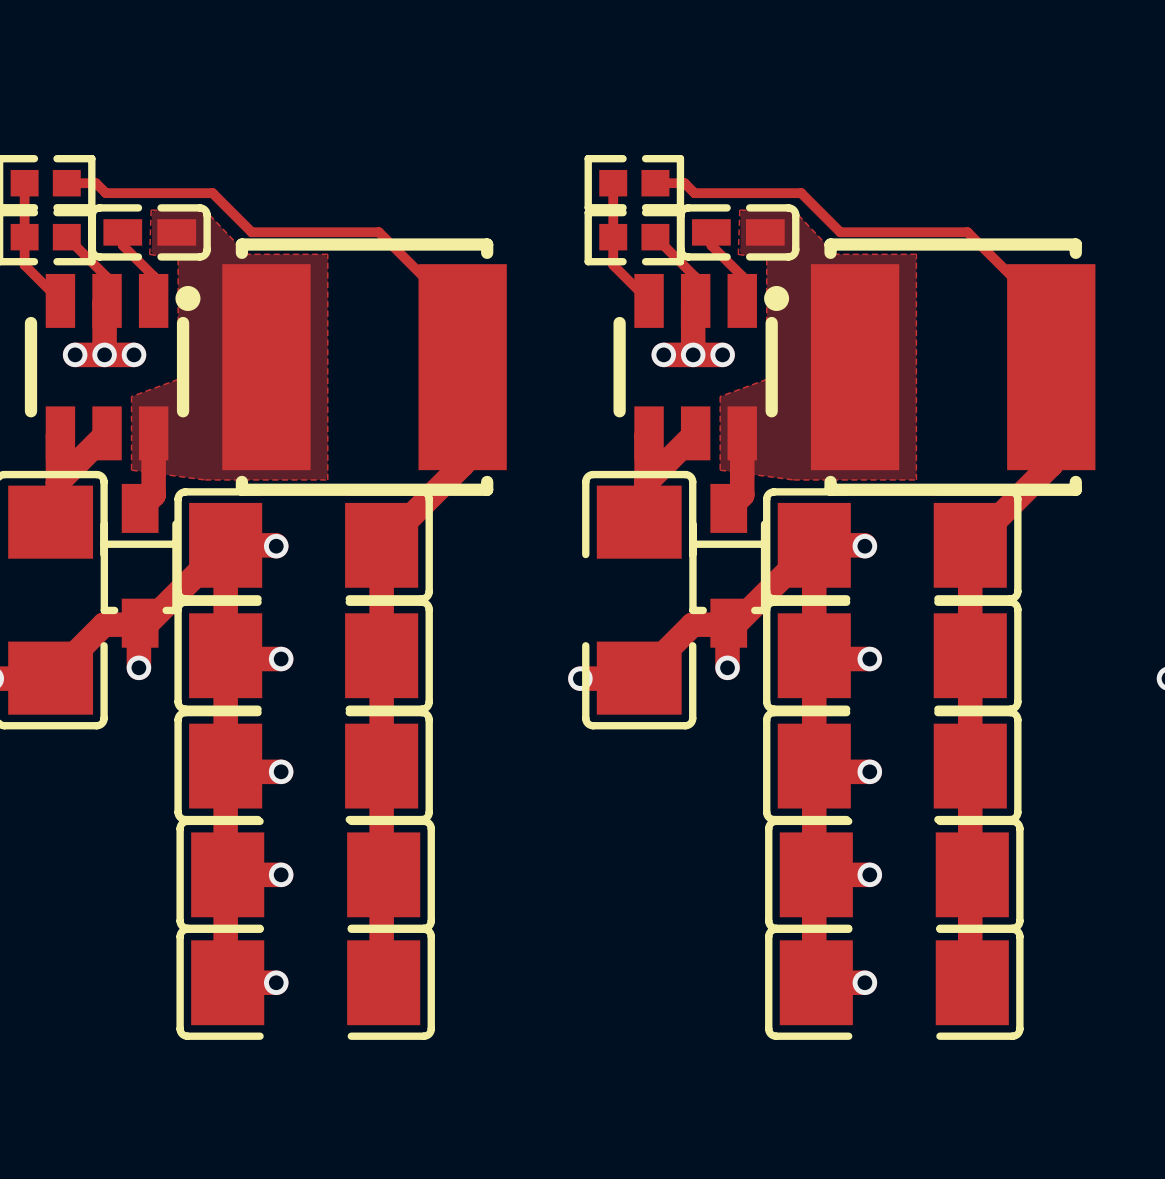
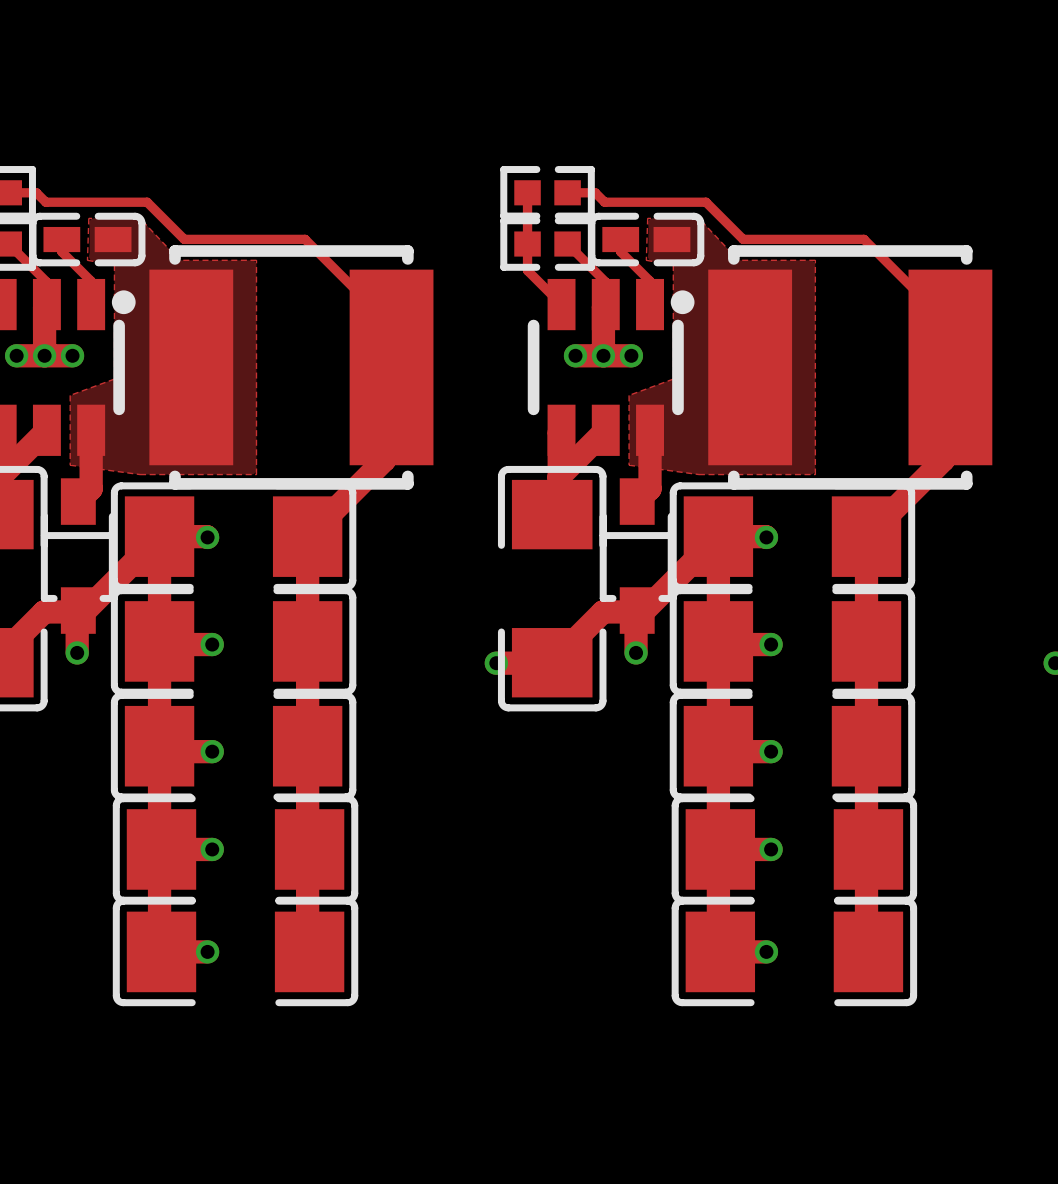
part footprint: [222, 238, 507, 496] -> [149, 245, 434, 490]
part footprint: [810, 238, 1096, 496] -> [708, 245, 993, 490]

